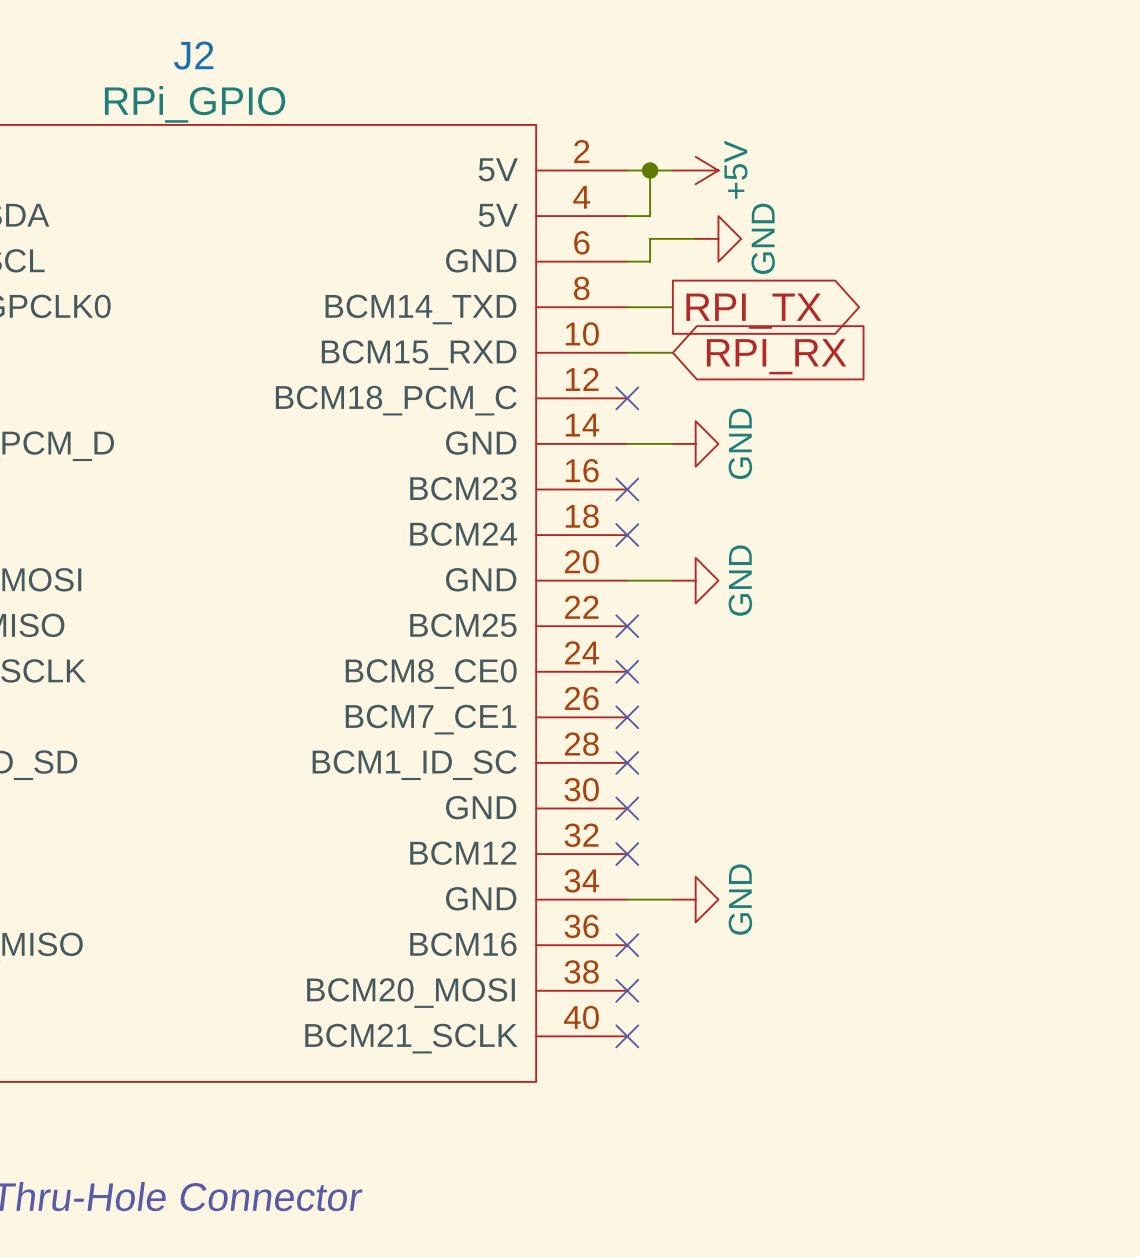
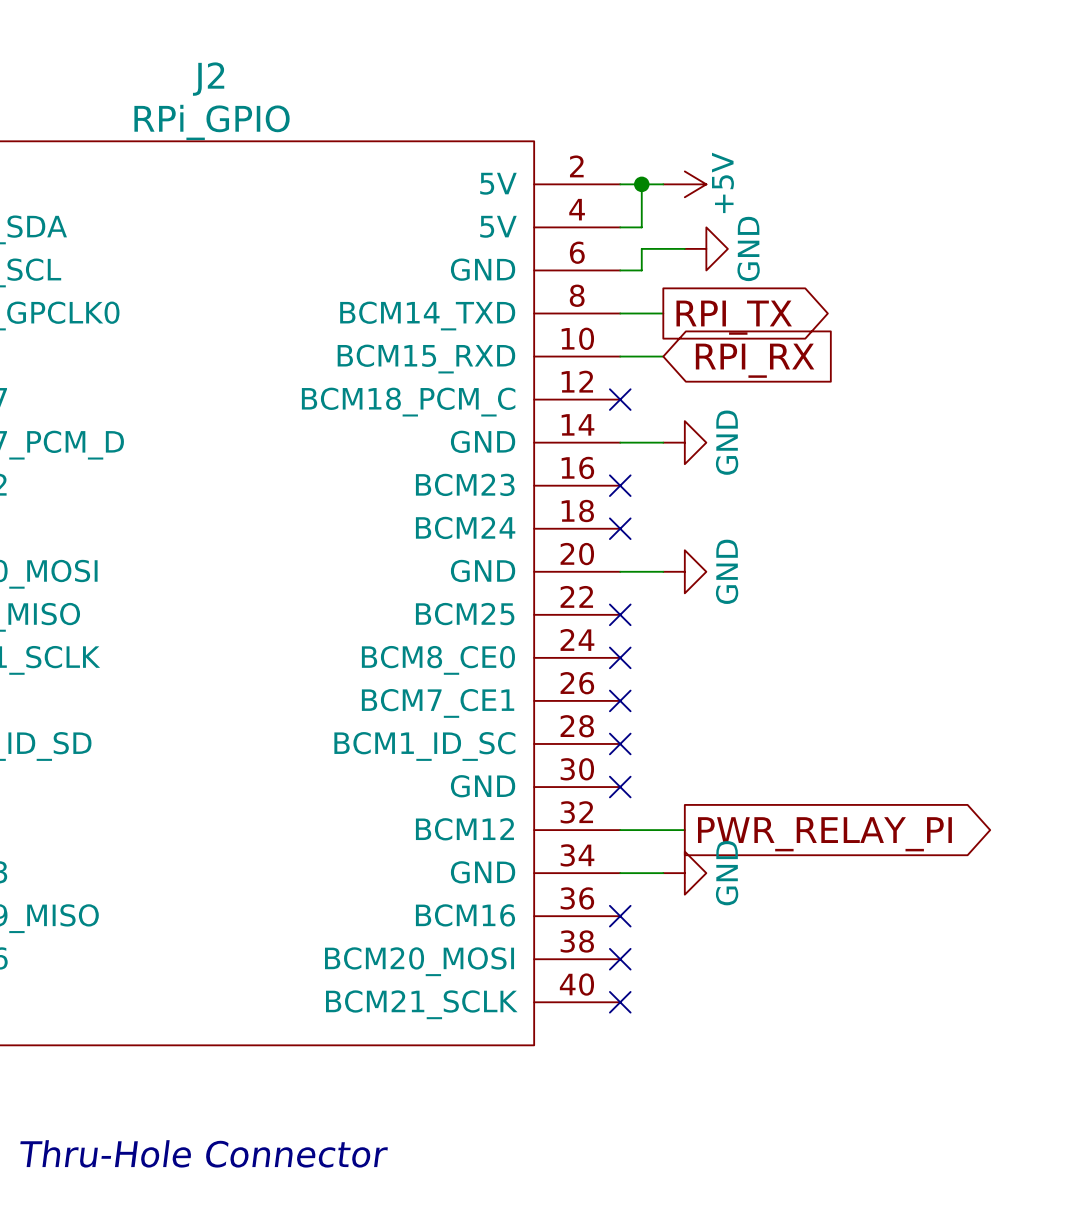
wire: none -> (620, 830) (684, 830)
no-connect mark: (627, 854) -> none
global label: none -> PWR_RELAY_PI (824, 834)

